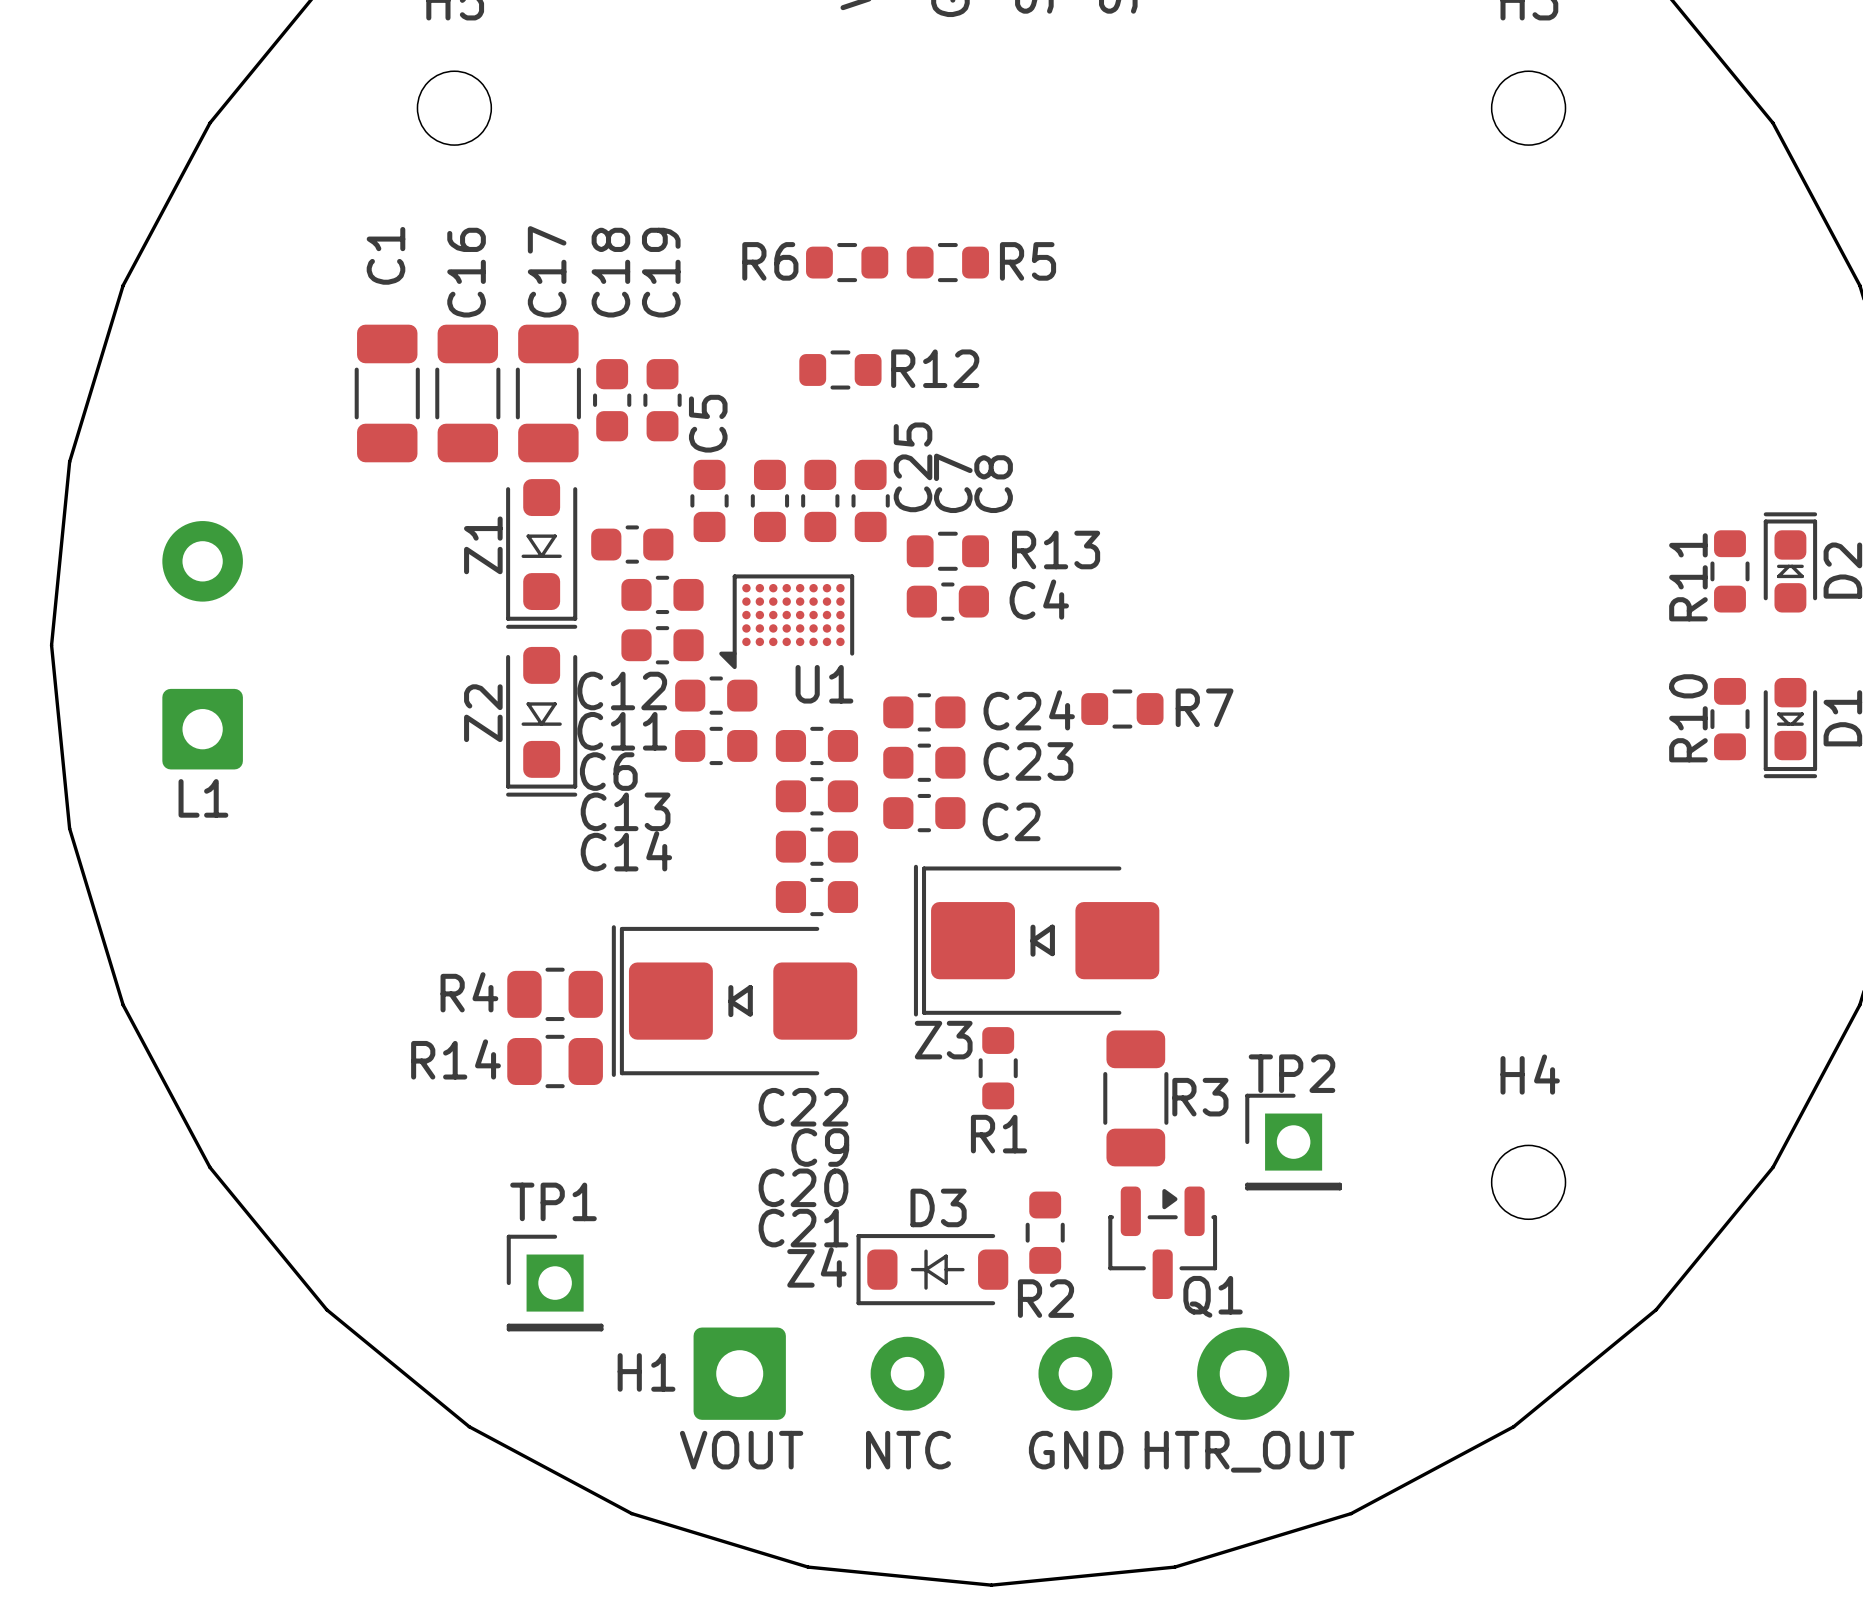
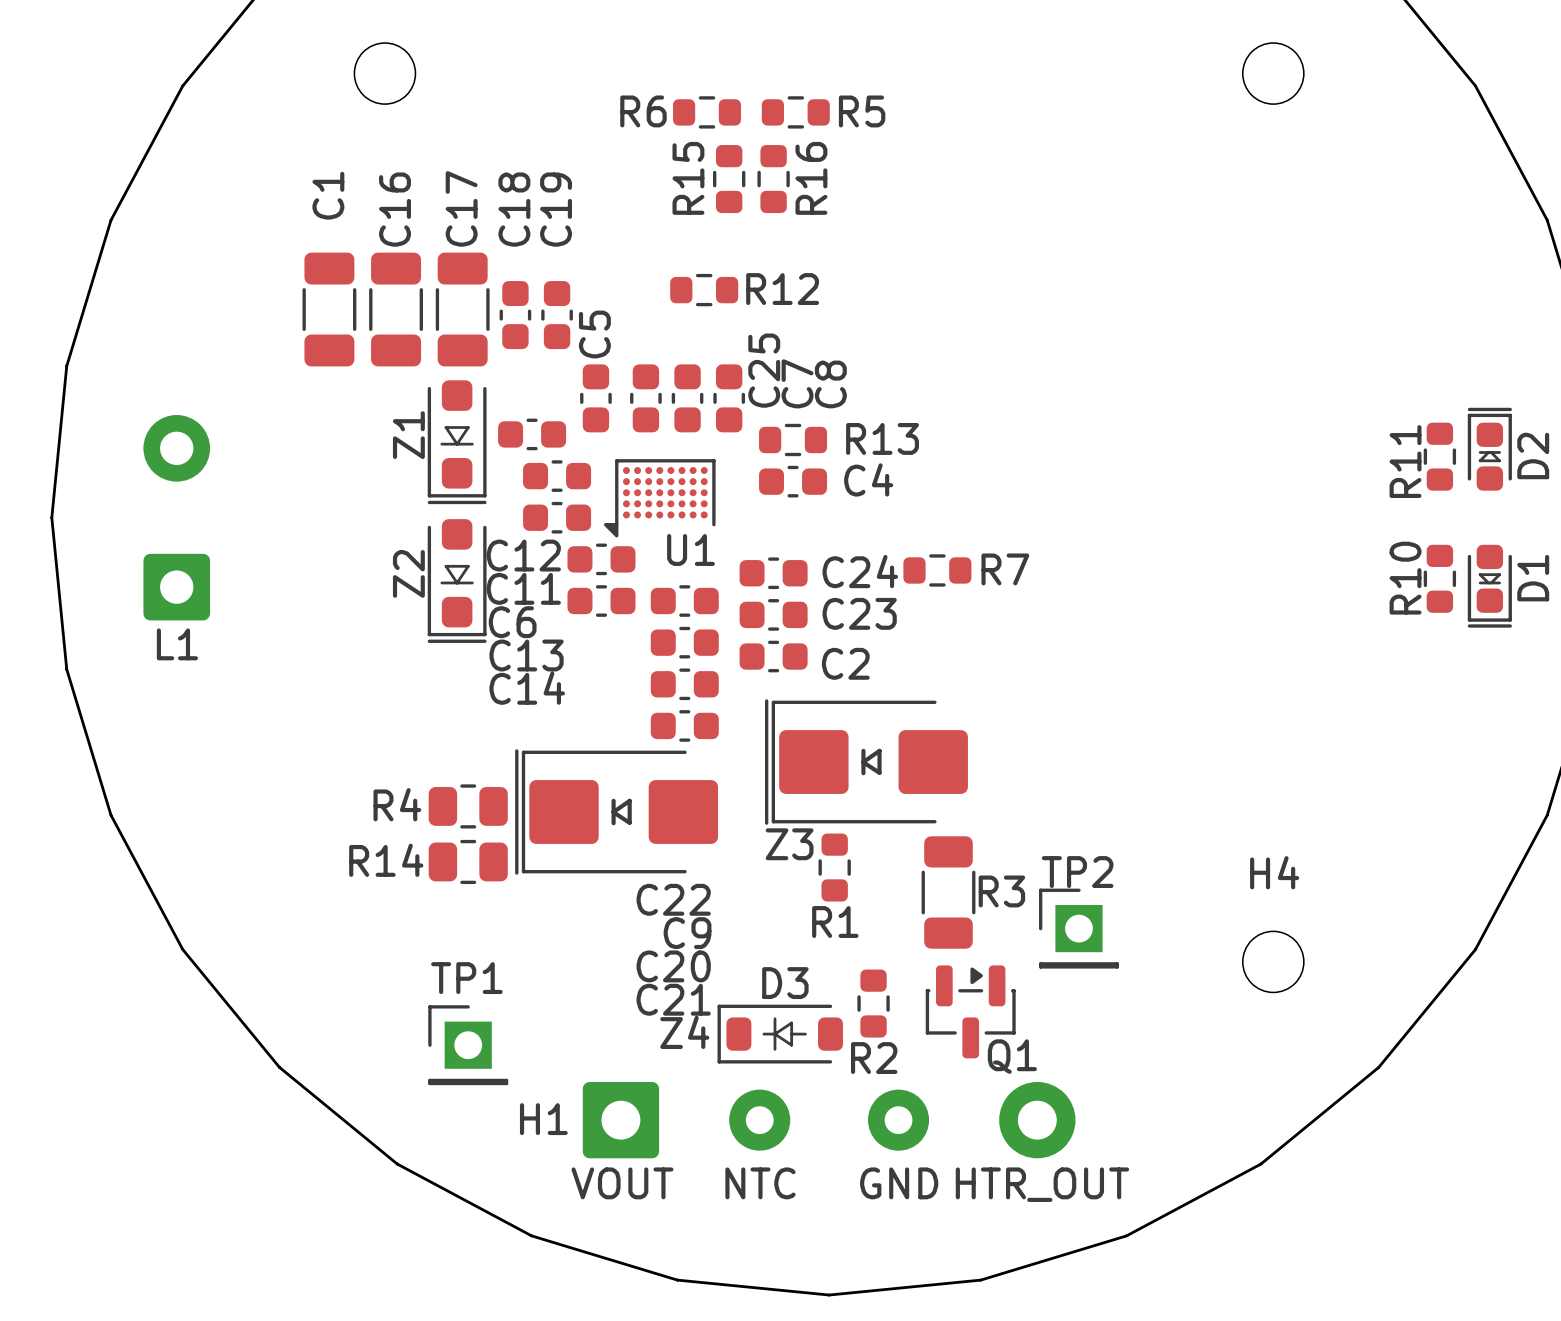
R15: none -> (729, 179)
R16: none -> (773, 179)
R6 position: (847, 262) -> (706, 112)
R5 position: (947, 262) -> (795, 112)

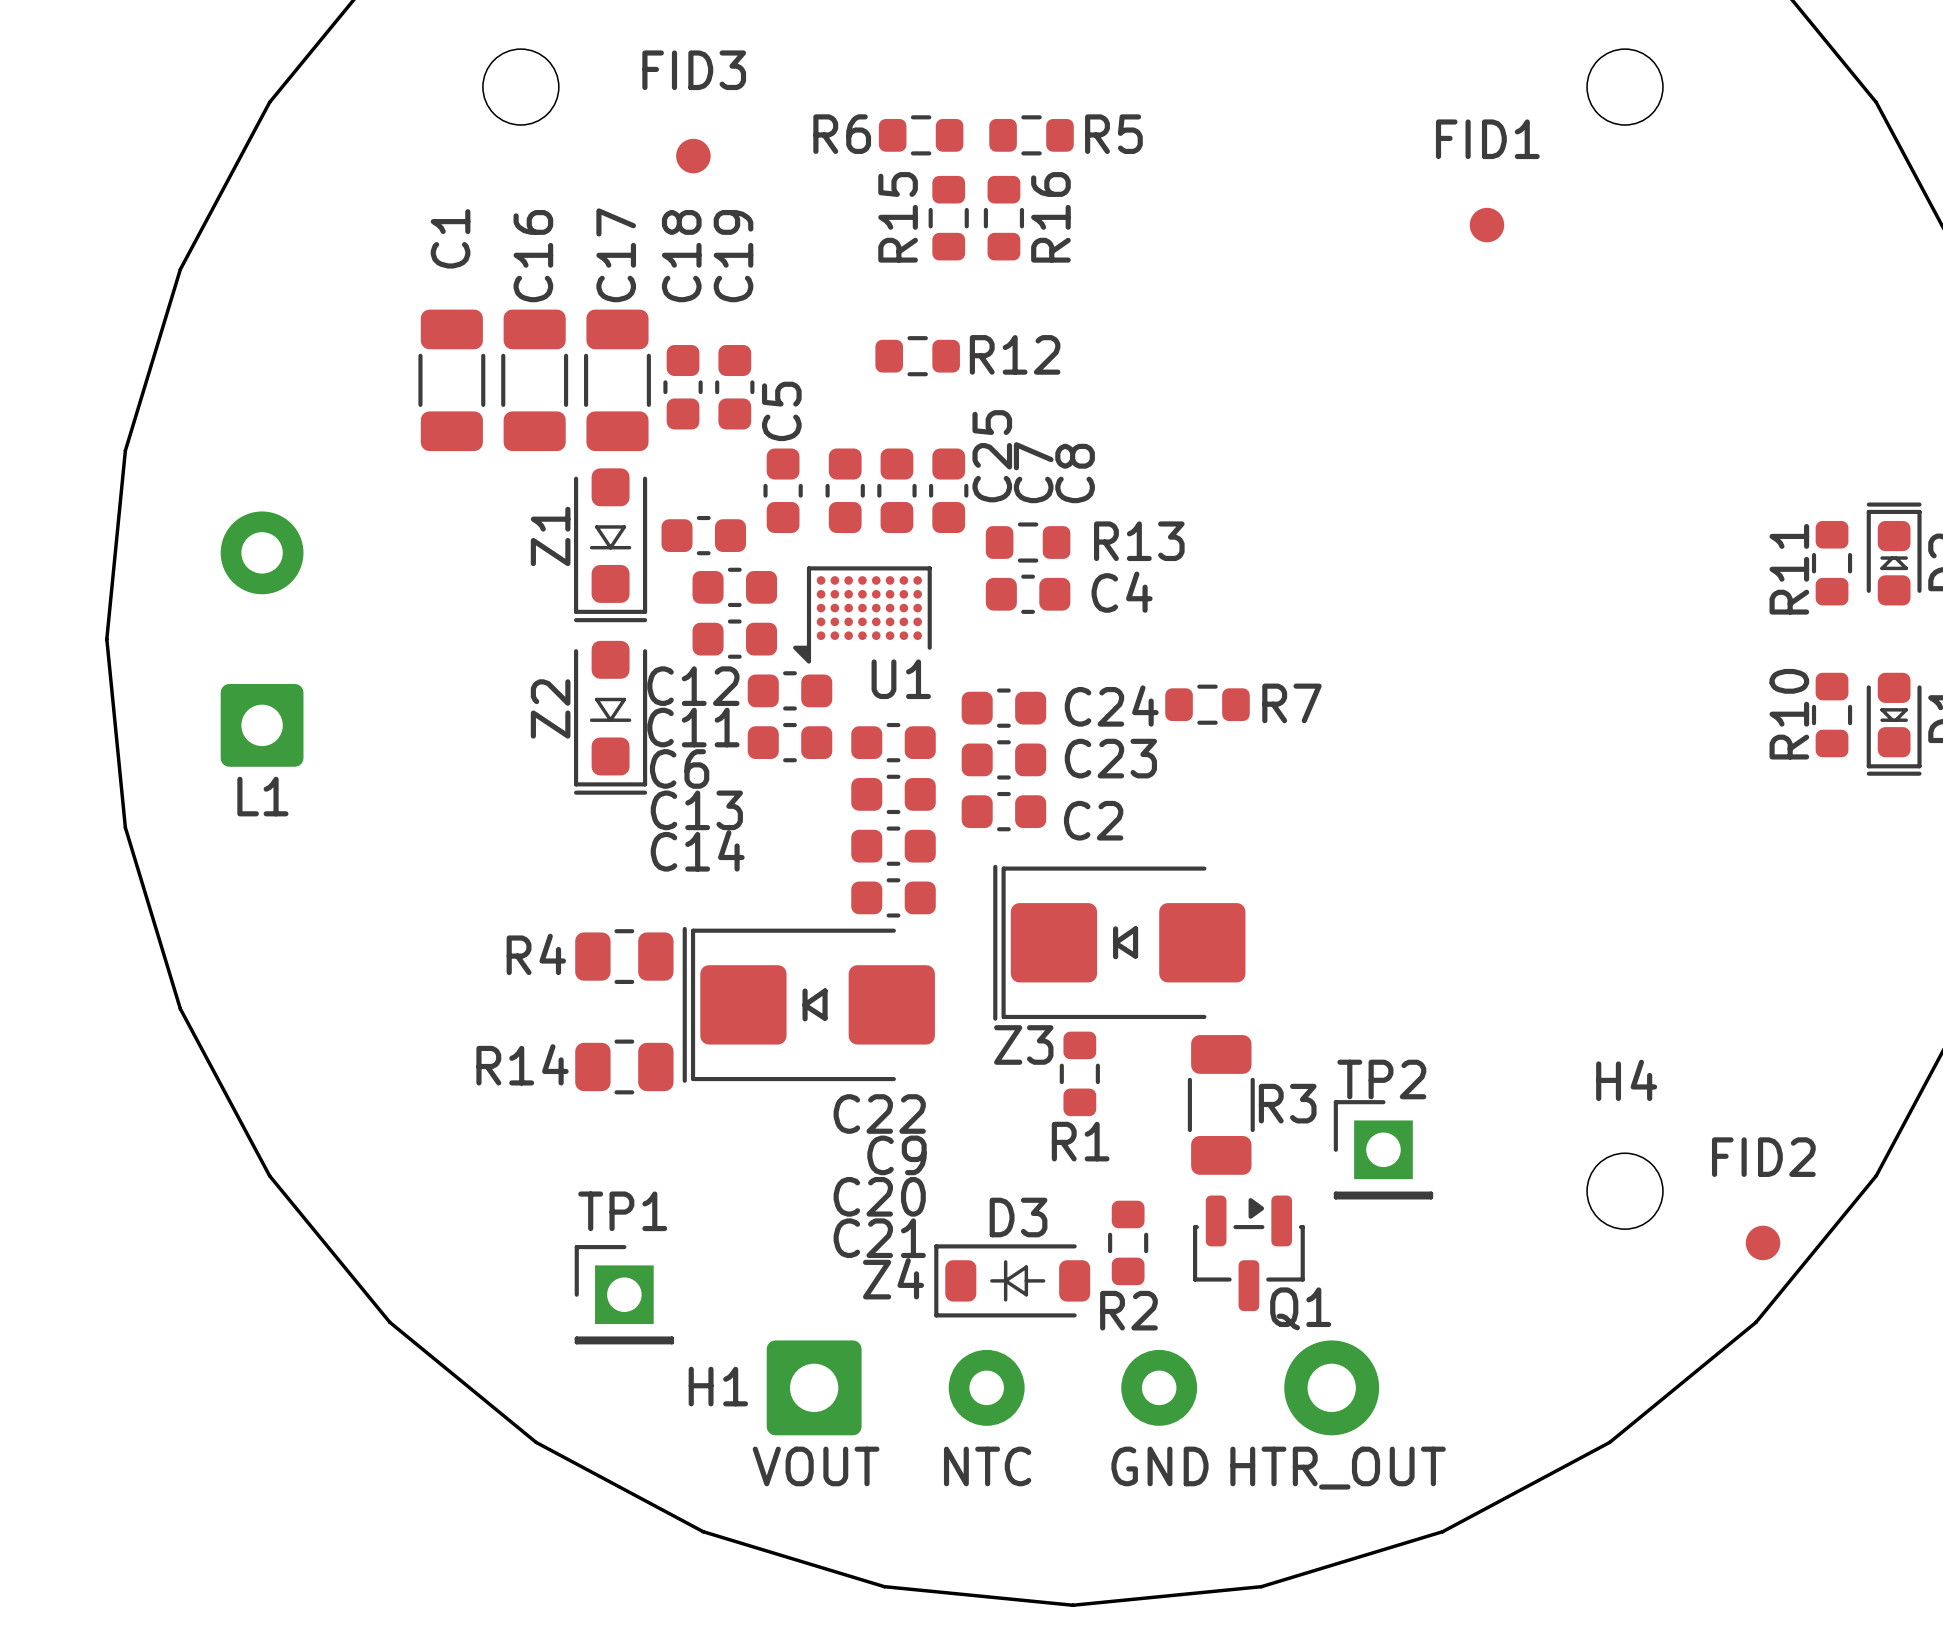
FID3: none -> (693, 156)
FID1: none -> (1486, 225)
R4 position: (468, 806) -> (624, 956)
FID2: none -> (1763, 1242)

